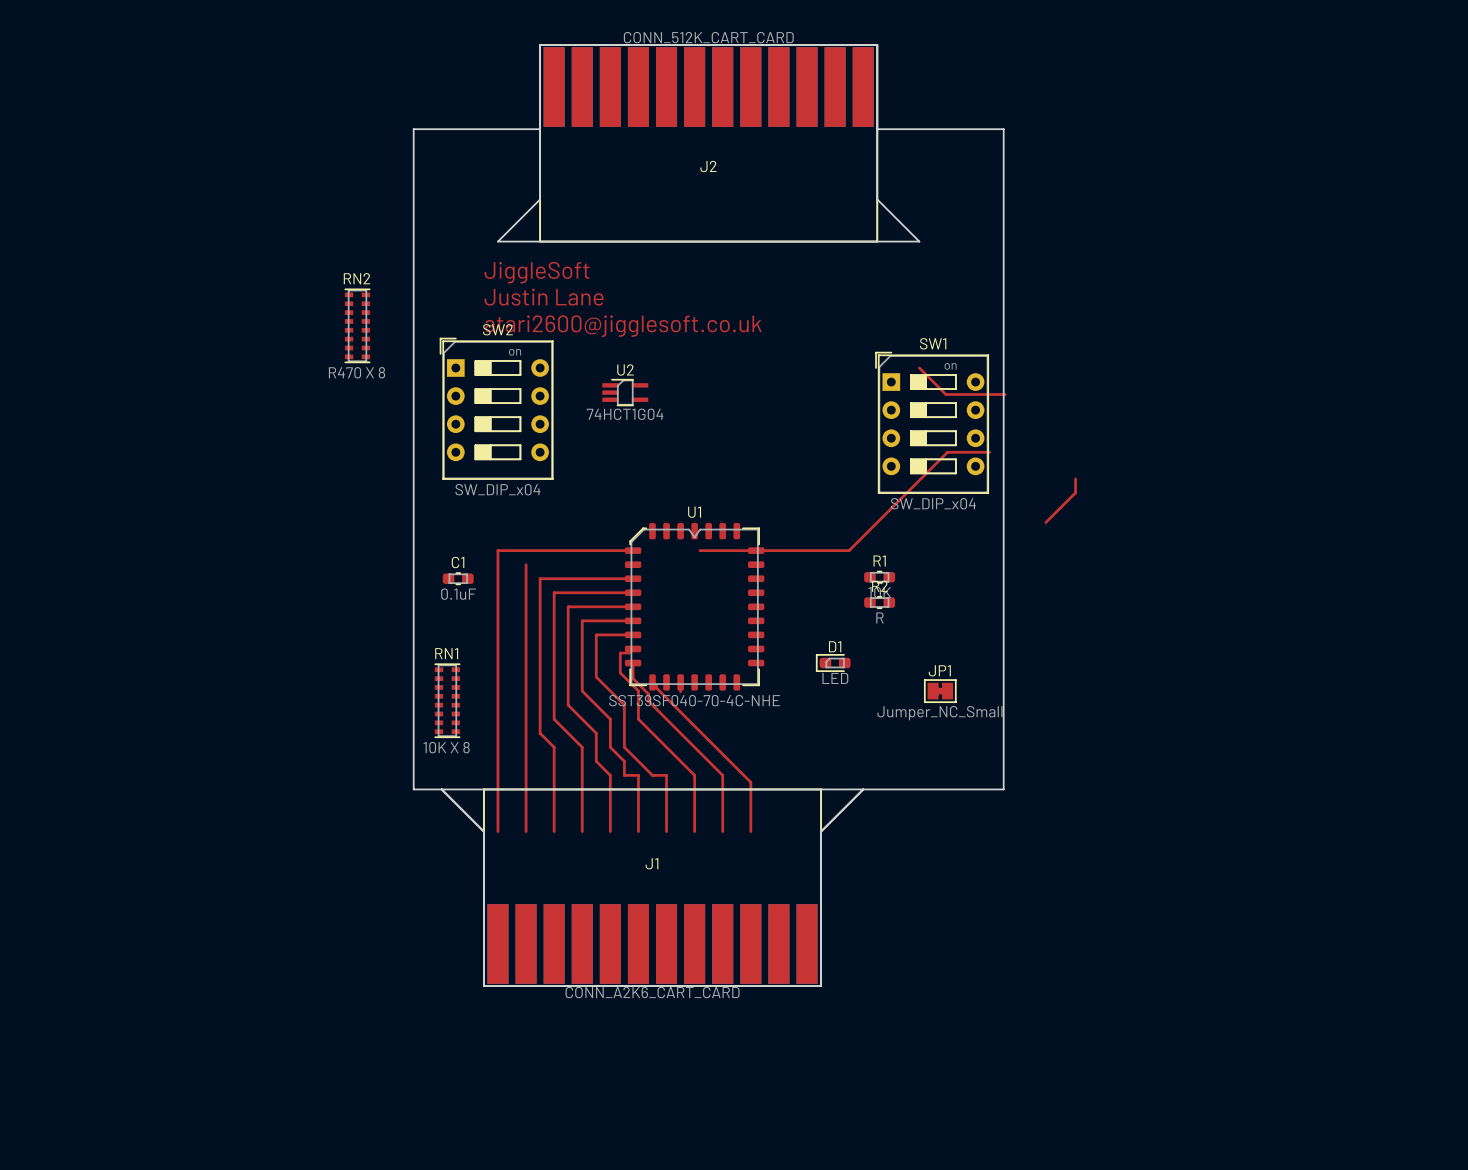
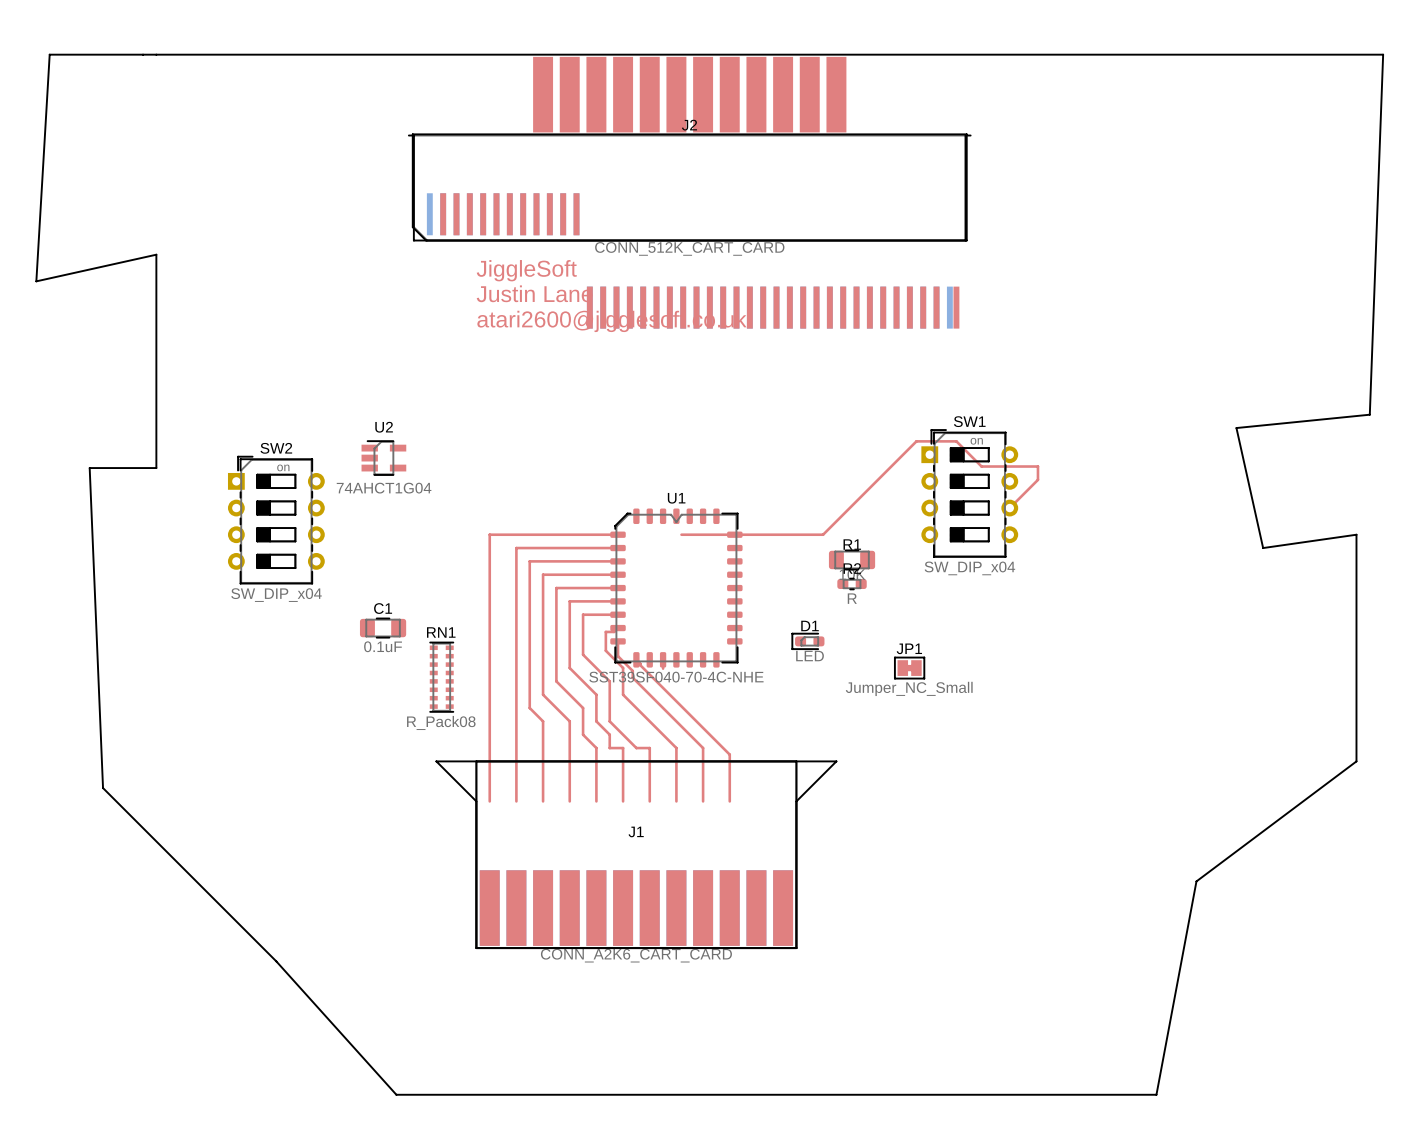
J2 value position: CONN_512K_CART_CARD (708, 37) -> CONN_512K_CART_CARD (689, 248)
J2 footprint: [497, 44, 921, 243] -> [408, 56, 972, 329]
board edge: (540, 44) (540, 129) (413, 129) (413, 789) (441, 789) (483, 831) (483, 986) (821, 986) (821, 831) (863, 789) (1003, 789) (1003, 129) (877, 129) (877, 44) -> (529, 54) (49, 54) (36, 281) (156, 254) (156, 468) (89, 468) (103, 788) (276, 961) (396, 1094) (1156, 1094) (1196, 881) (1356, 761) (1356, 534) (1263, 548) (1236, 428) (1369, 414) (1383, 54) (849, 54)
J2 name position: J2 (708, 166) -> J2 (689, 125)
RN2: R470 X 8 (357, 325) -> none
SW2 footprint: [439, 337, 554, 480] -> [227, 456, 325, 585]
SW1 footprint: [875, 351, 989, 494] -> [921, 429, 1019, 558]
top track: (919, 368) (945, 394) (1005, 394) -> (956, 441) (981, 466) (1037, 466)
U2 footprint: [602, 379, 649, 407] -> [361, 440, 407, 476]
U2 value: 74HCT1G04 (625, 414) -> 74AHCT1G04 (384, 488)
top track: none -> (516, 548) (618, 548)
R1 footprint: [864, 570, 896, 584] -> [828, 549, 876, 571]
C1 footprint: [442, 572, 474, 586] -> [359, 617, 407, 639]
RN1 value: 10K X 8 (446, 747) -> R_Pack08 (441, 722)

